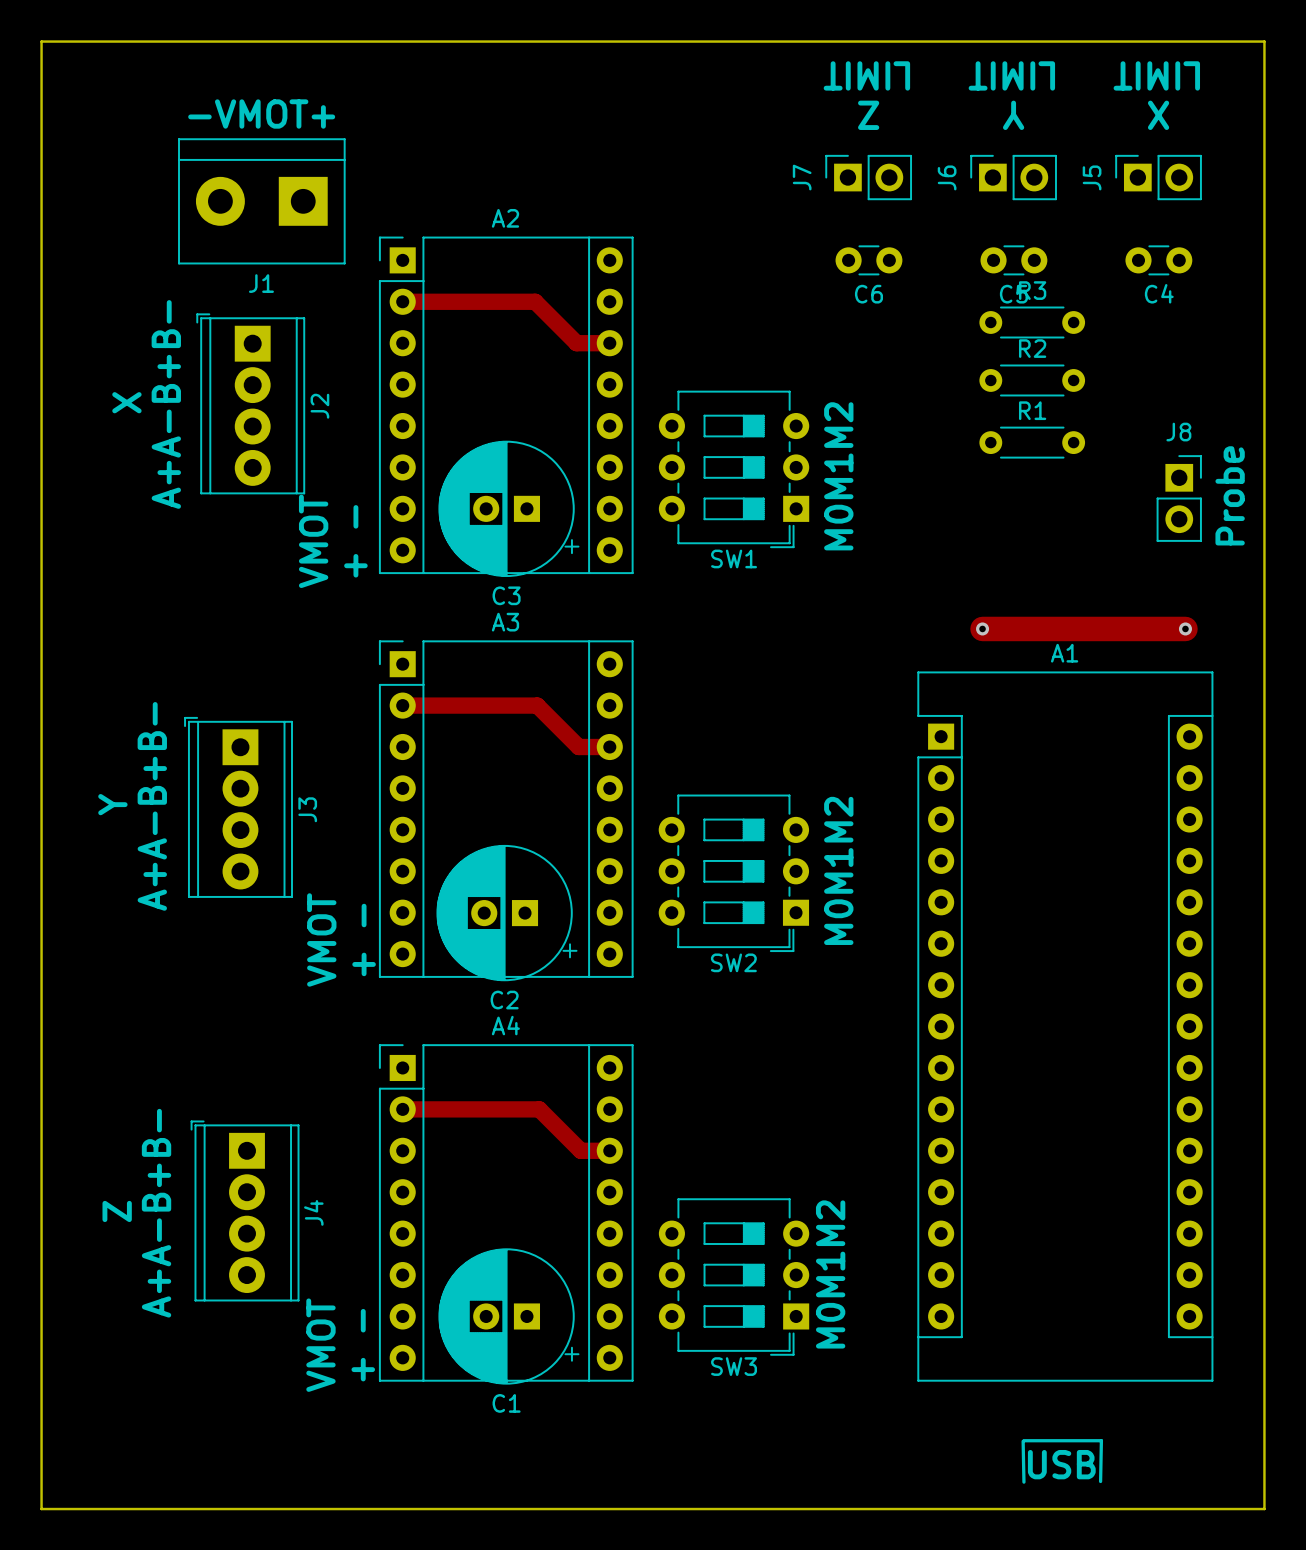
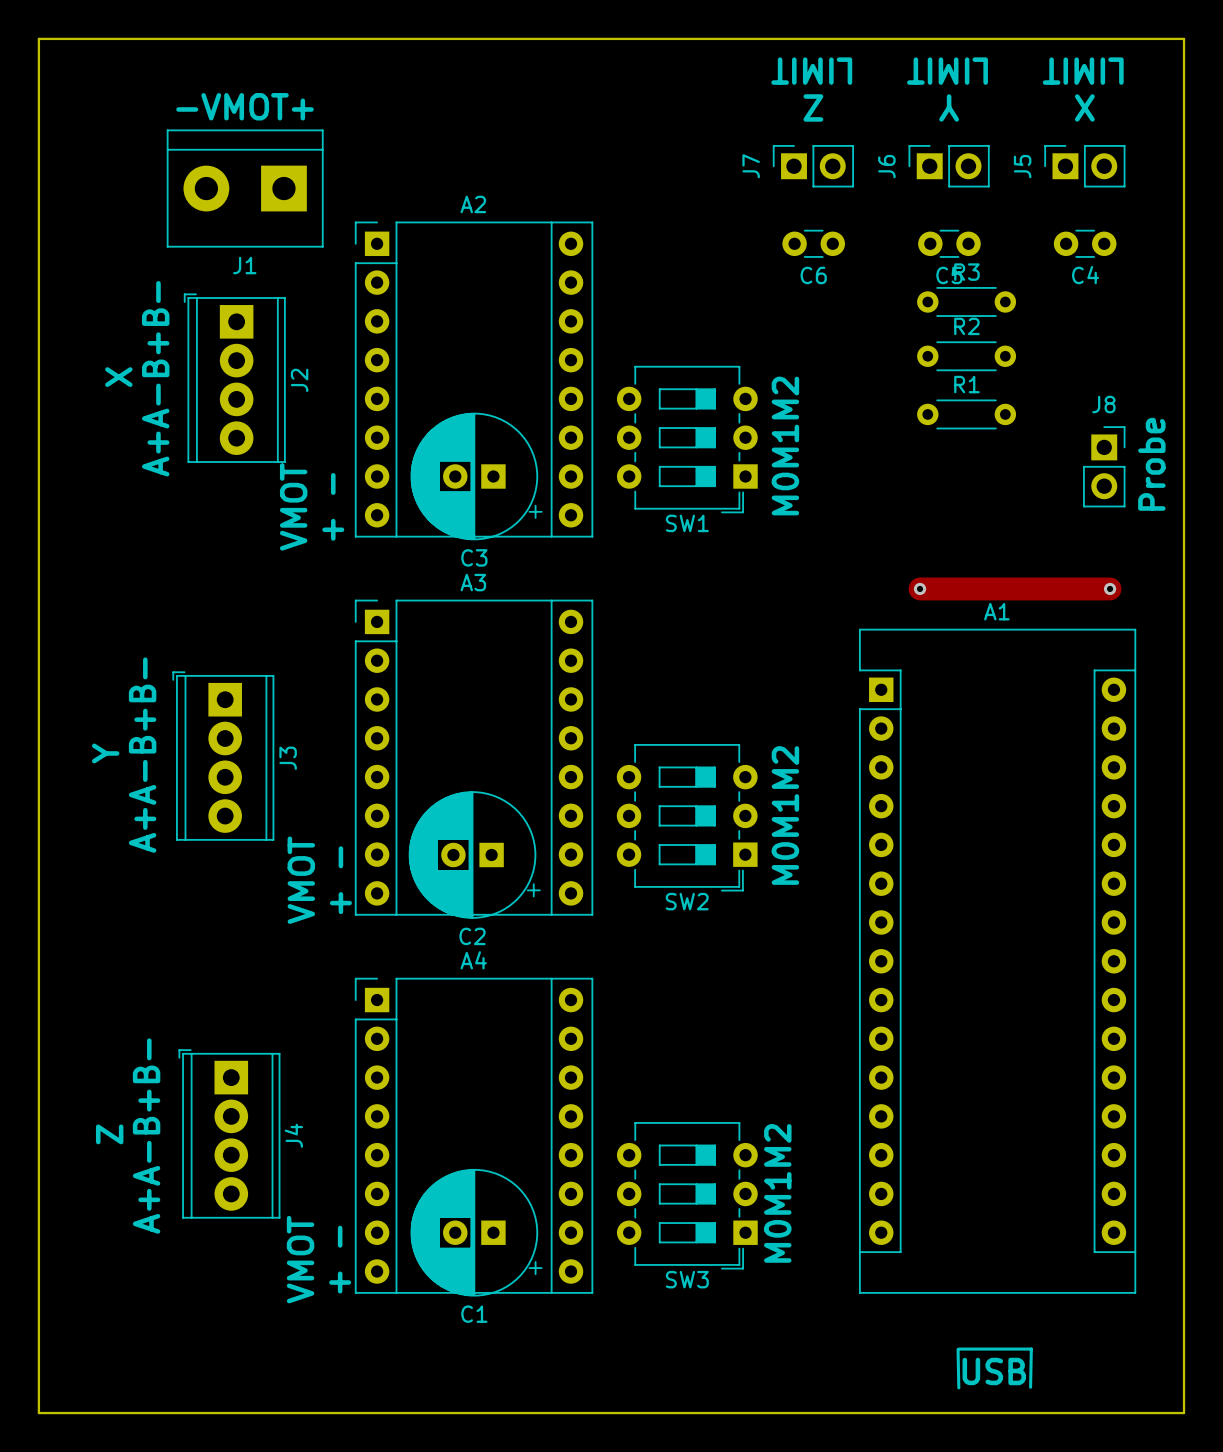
track: (402, 301) (535, 301) (576, 343) (609, 343) -> none
track: (402, 705) (537, 705) (578, 747) (609, 747) -> none
track: (402, 1109) (539, 1109) (580, 1150) (609, 1150) -> none

